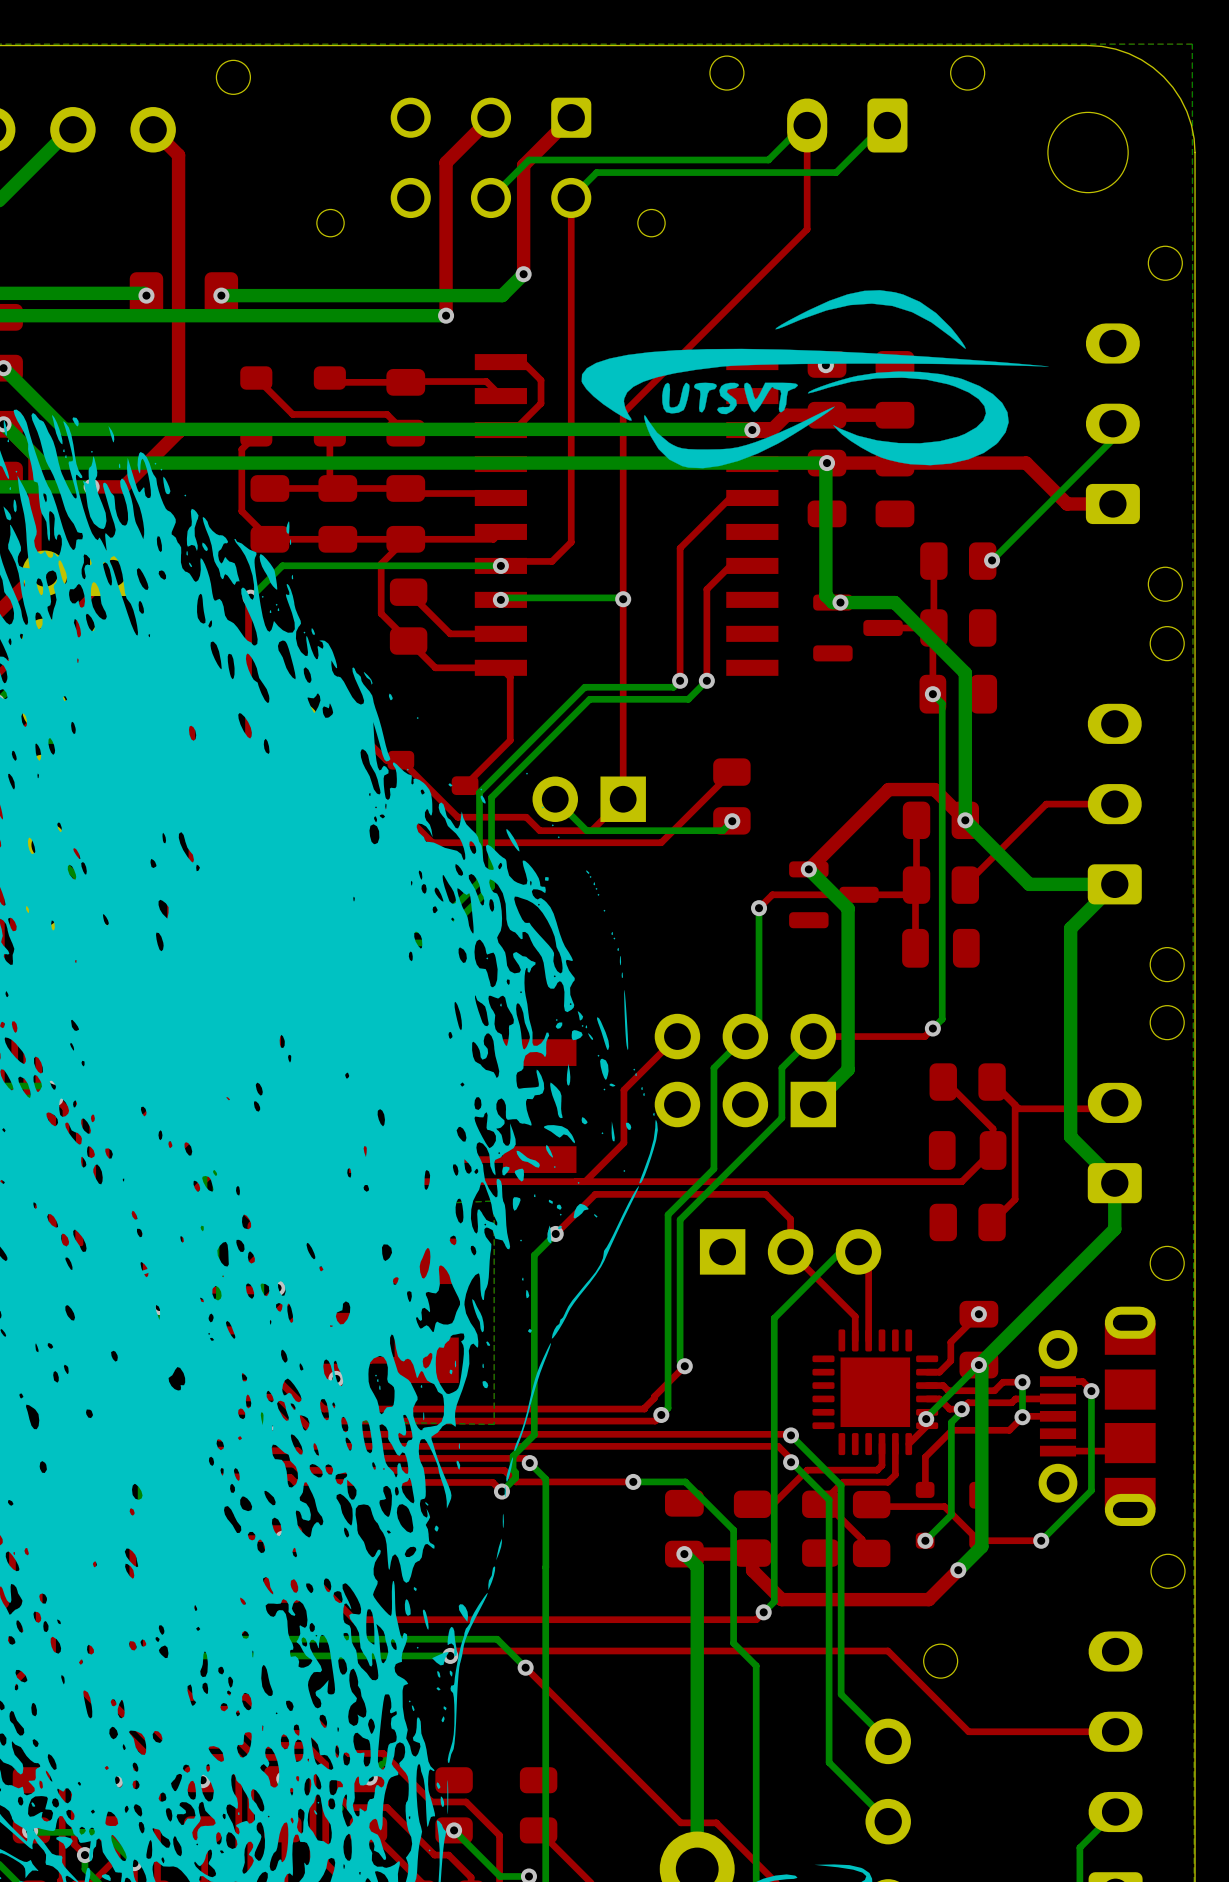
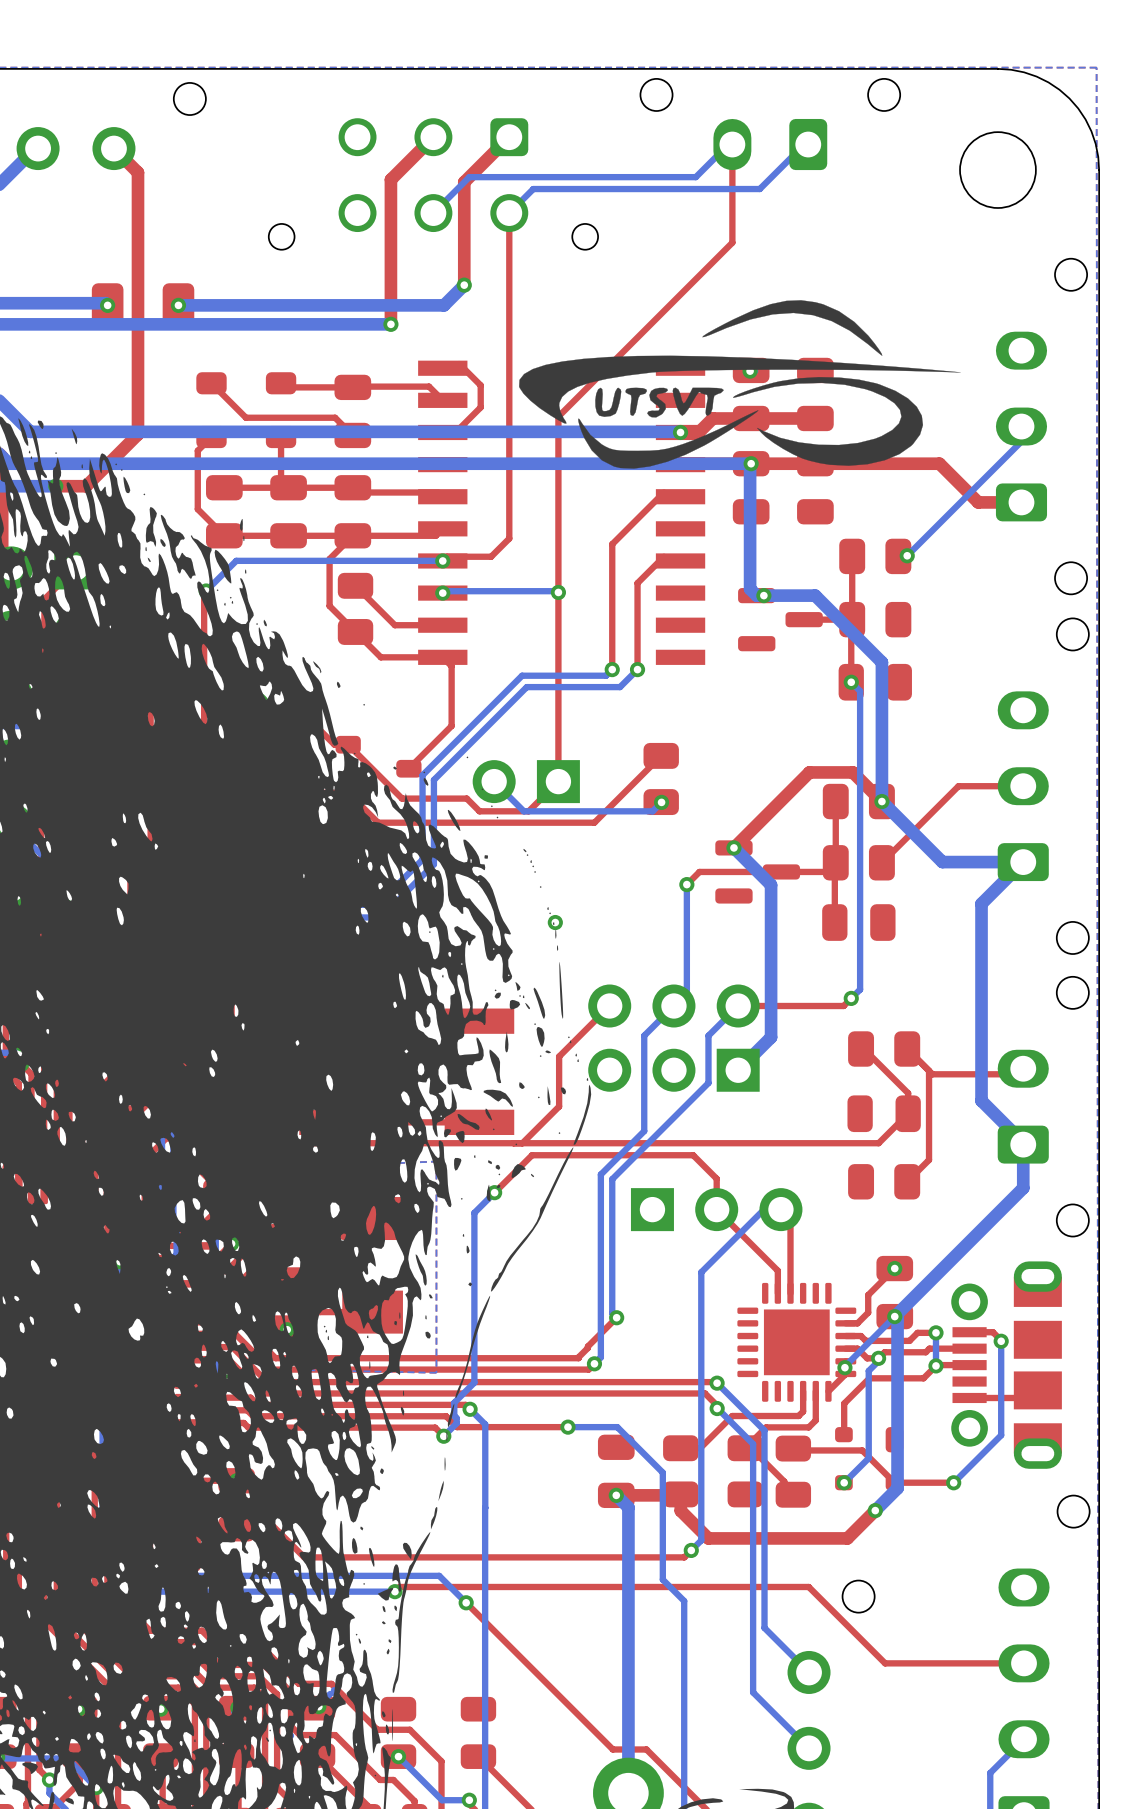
via: none -> (555, 922)

